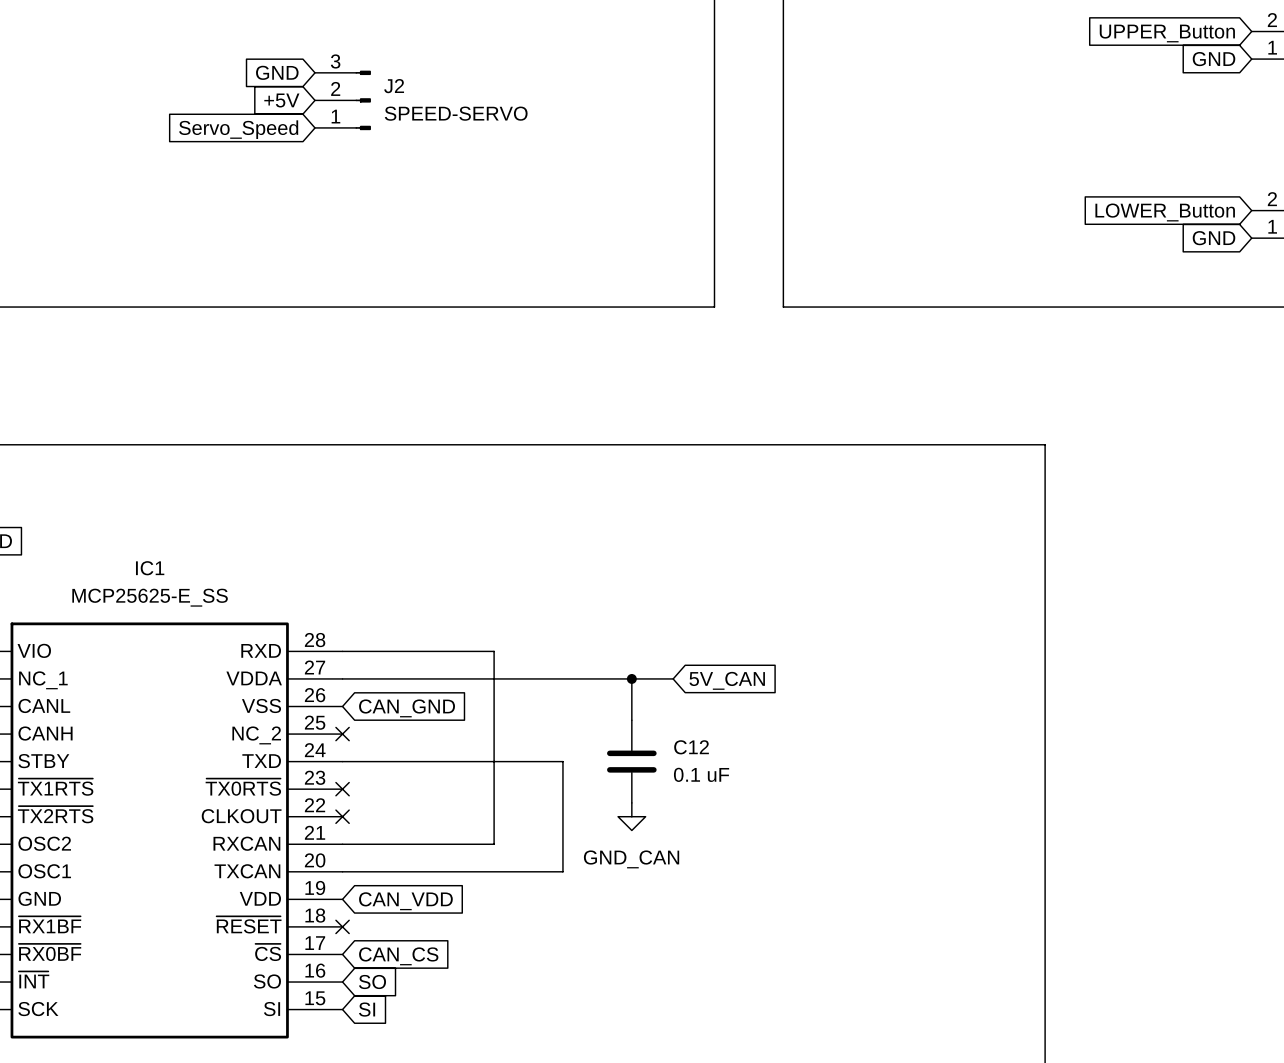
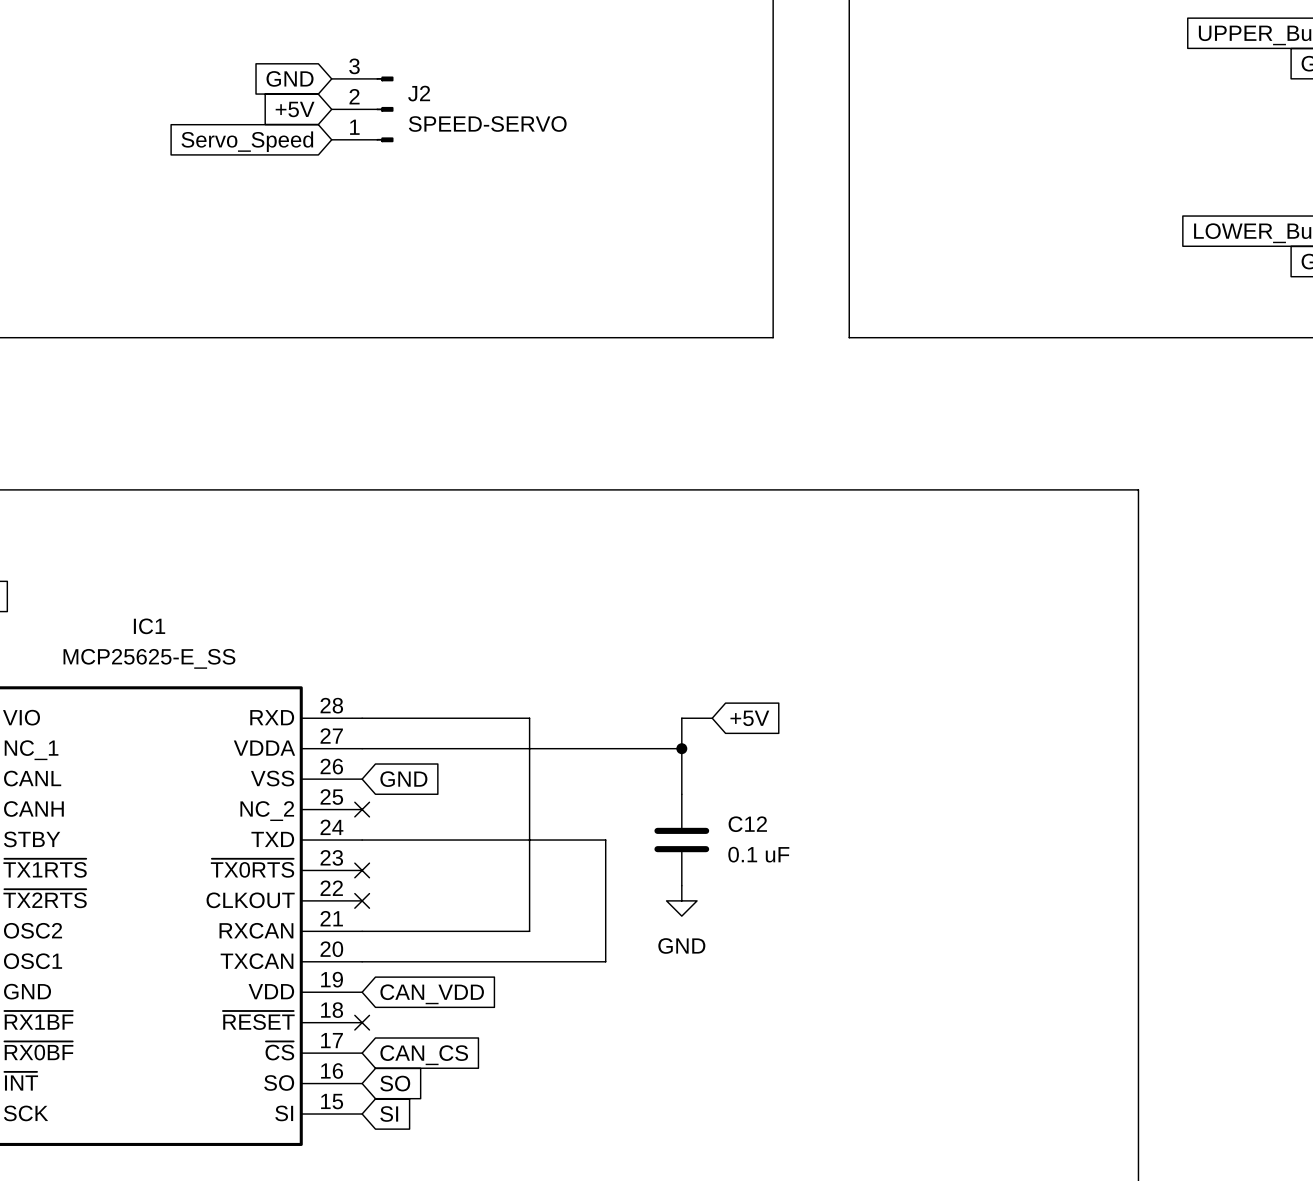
global label: none -> +5V (749, 718)
wire: (631, 678) (673, 678) -> (681, 748) (681, 718) (712, 718)
global label: 5V_CAN (727, 680) -> none
global label: CAN_GND (407, 708) -> GND (403, 779)
power symbol: GND_CAN (631, 816) -> GND (681, 900)

